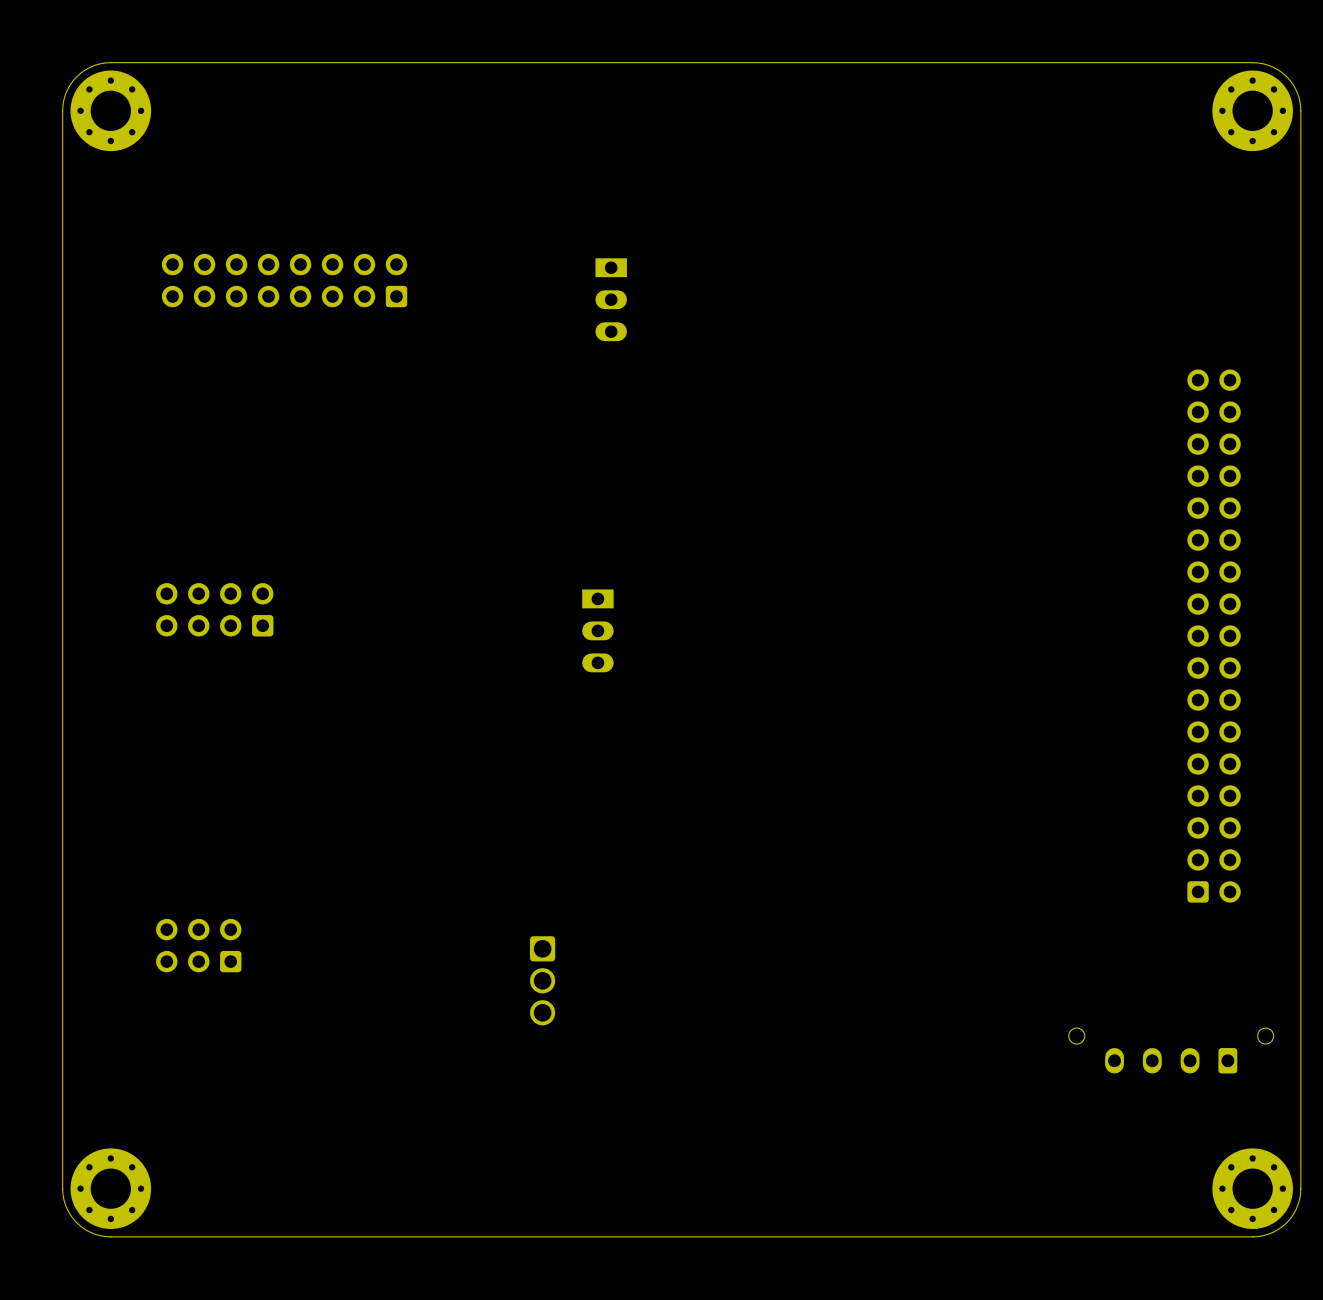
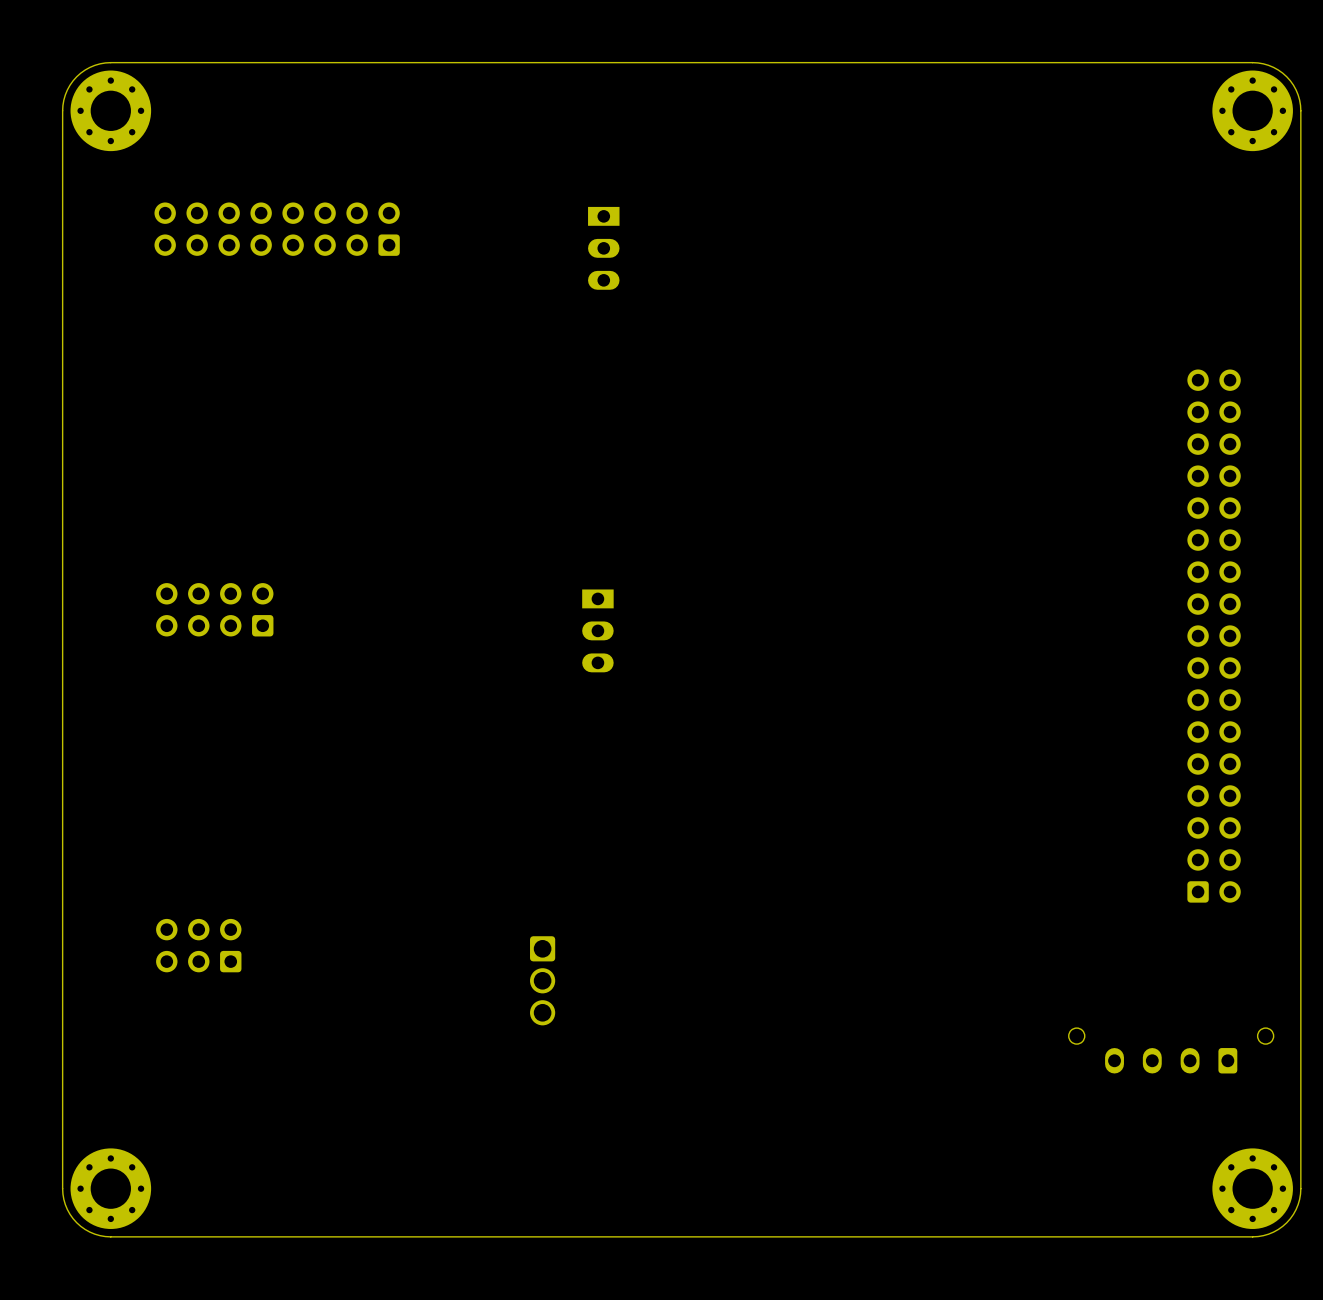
part position: (284, 280) -> (277, 229)
part position: (611, 299) -> (603, 248)

